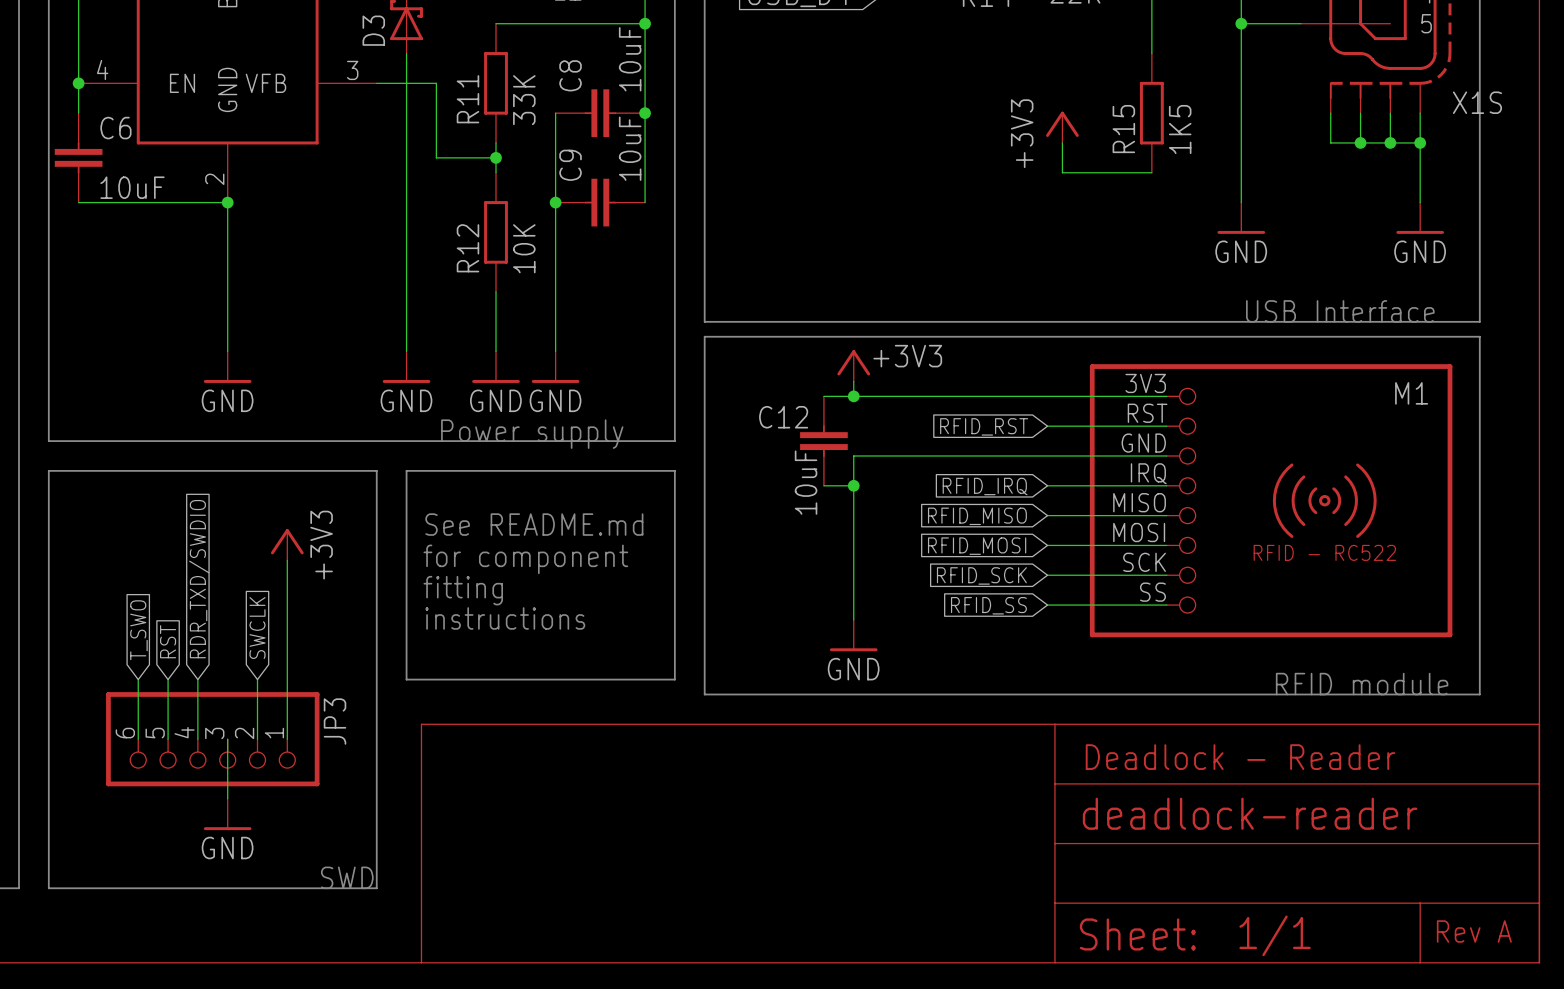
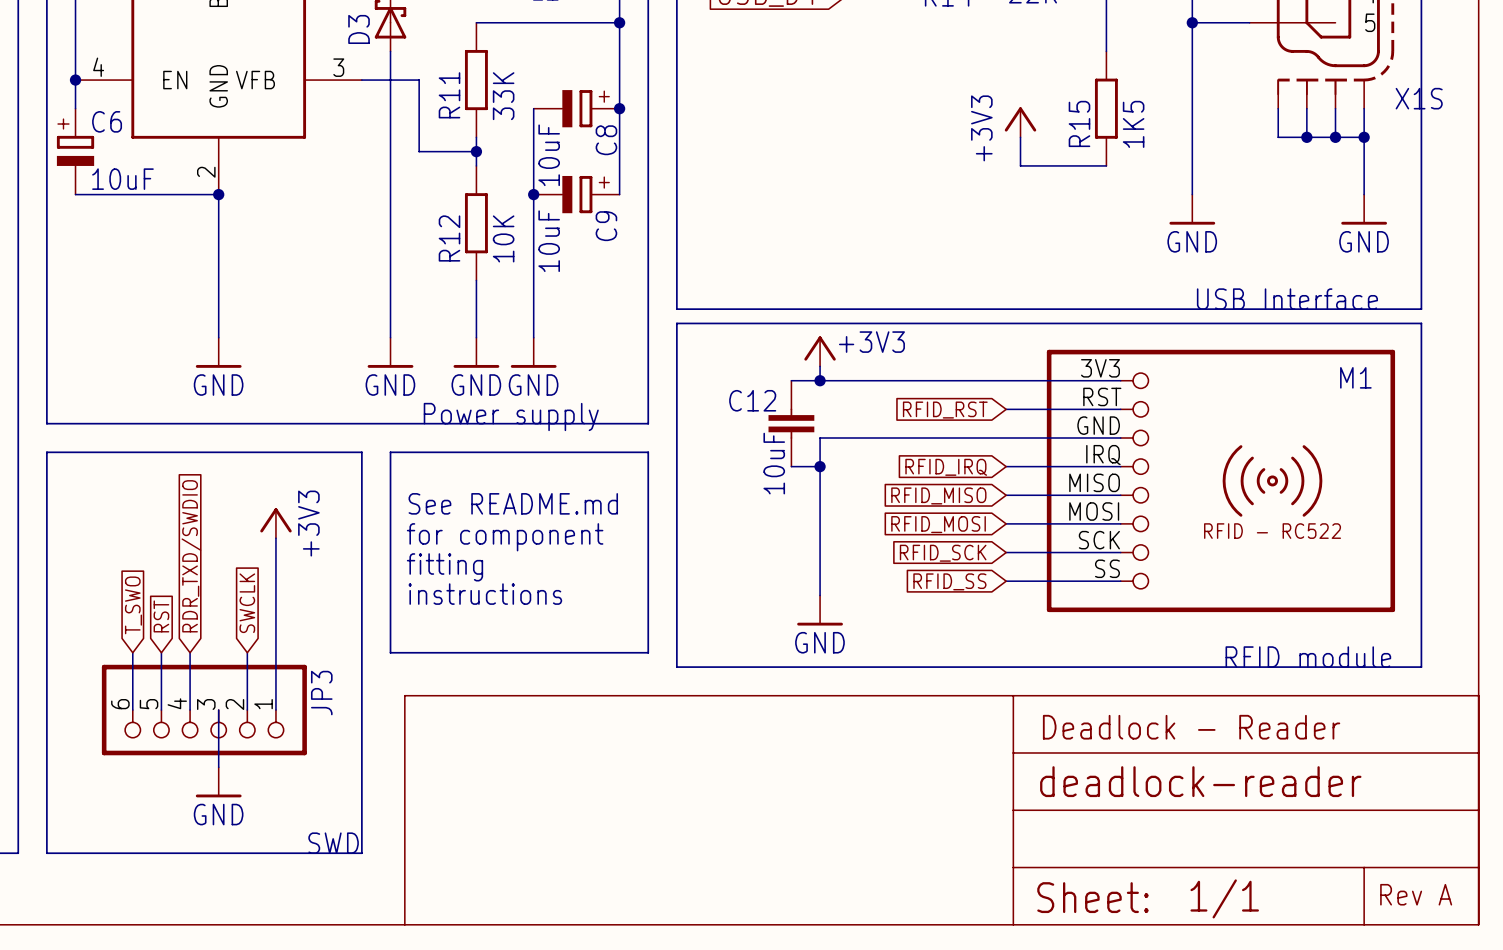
C8 value position: 10uF (630, 59) -> 10uF (549, 155)
C8 name position: C8 (570, 75) -> C8 (606, 140)
C8 symbol: [555, 89, 646, 138] -> [533, 90, 620, 128]
C6 symbol: [54, 113, 103, 203] -> [56, 108, 95, 195]
C9 value position: 10uF (630, 148) -> 10uF (549, 241)
C9 name position: C9 (570, 165) -> C9 (606, 226)
C9 symbol: [555, 178, 646, 227] -> [533, 175, 620, 214]

